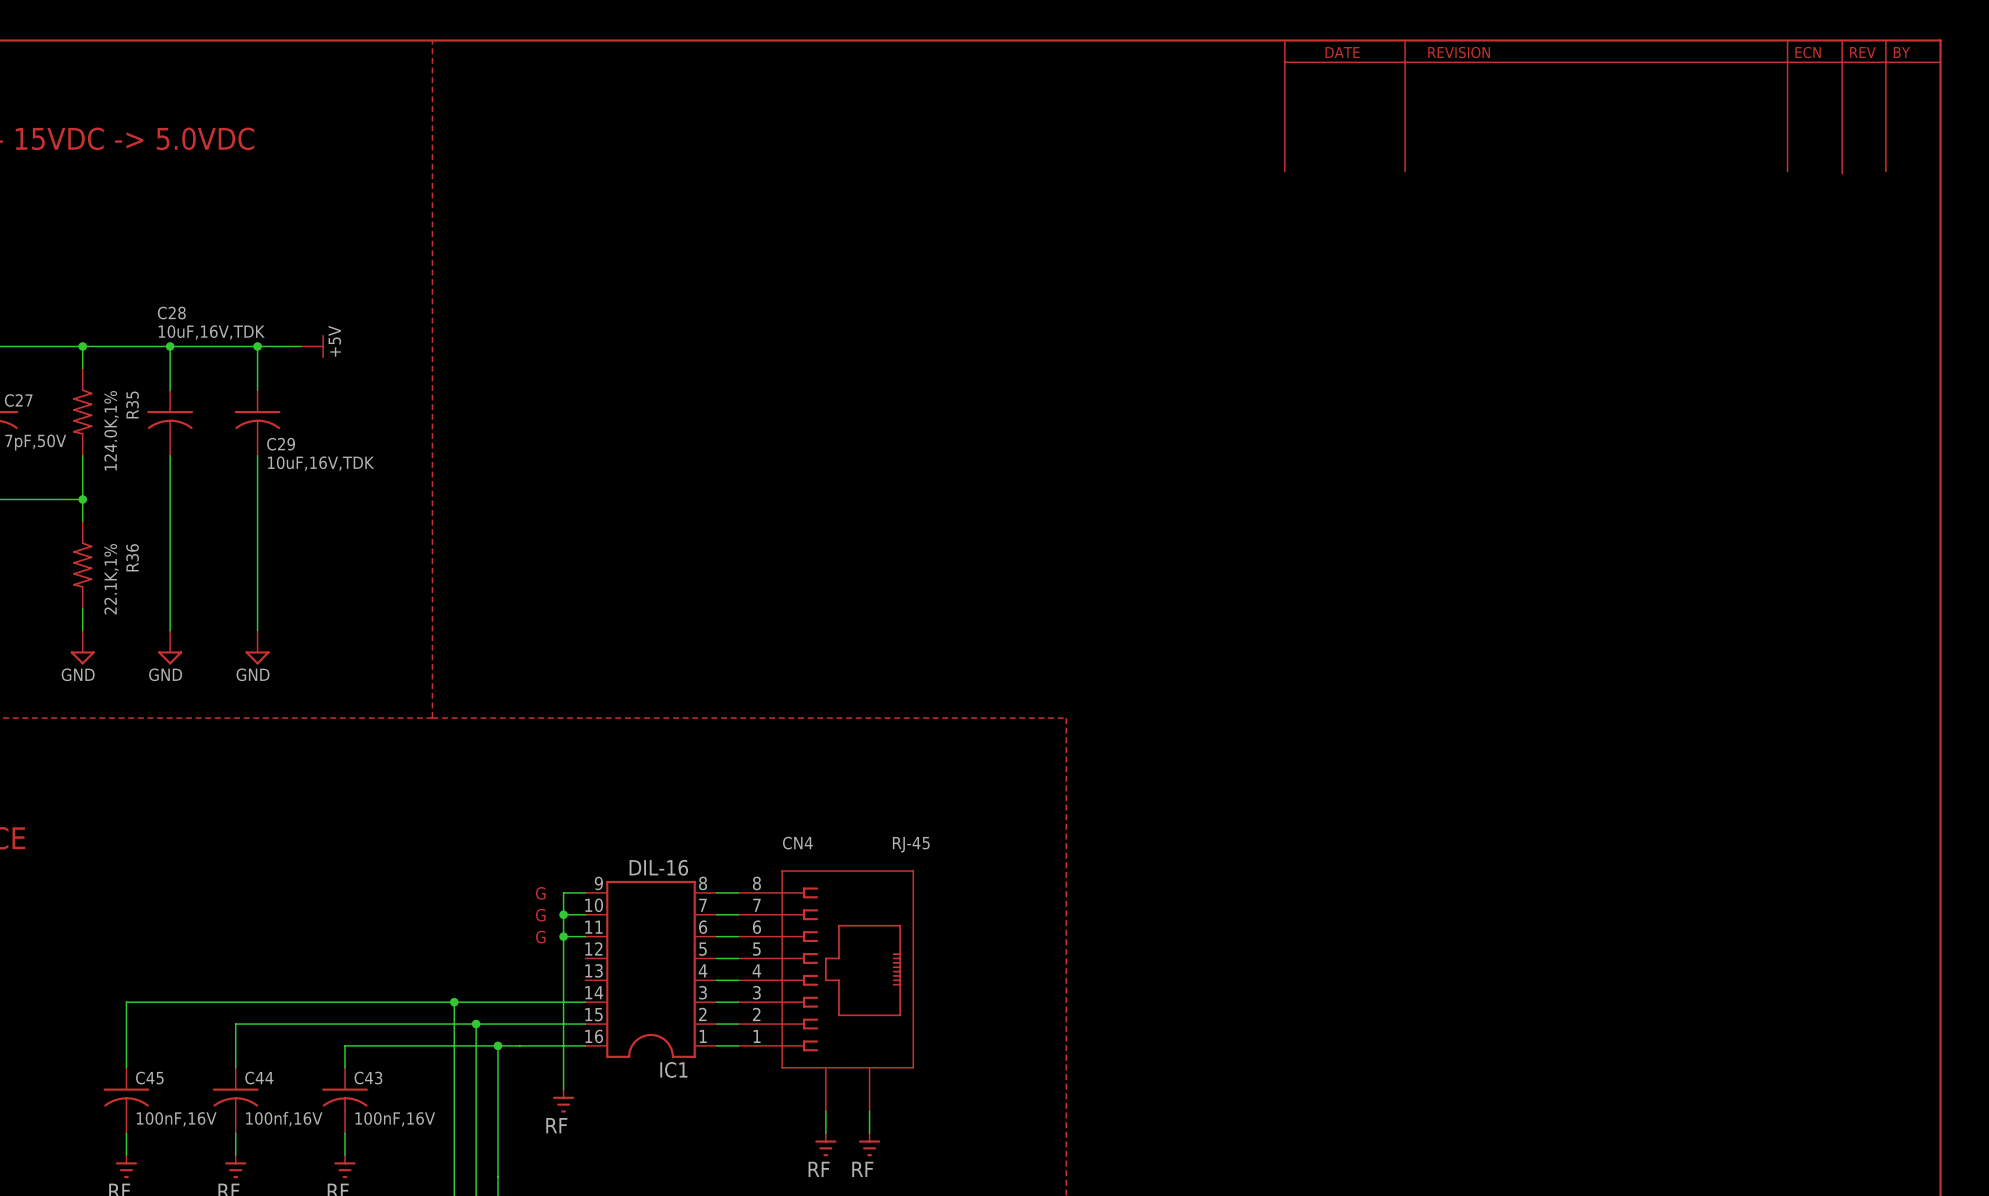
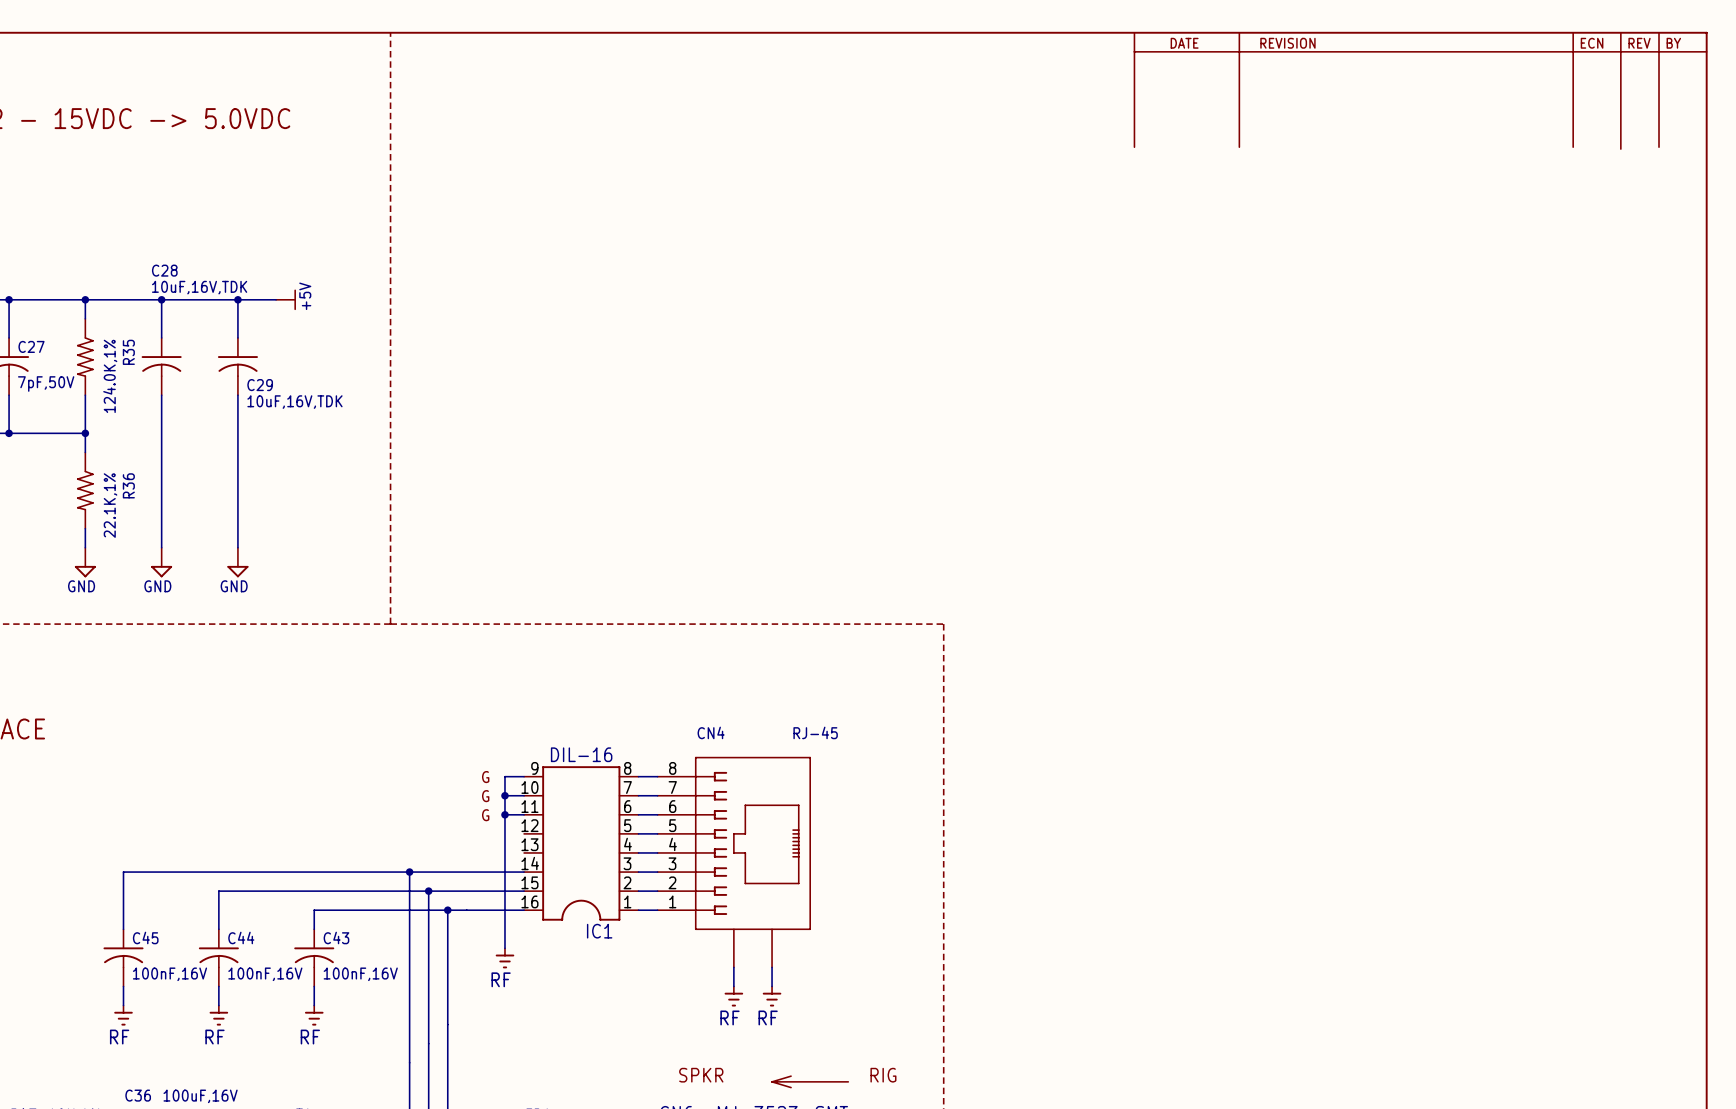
C44 value: 100nf,16V (284, 1119) -> 100nF,16V (265, 974)

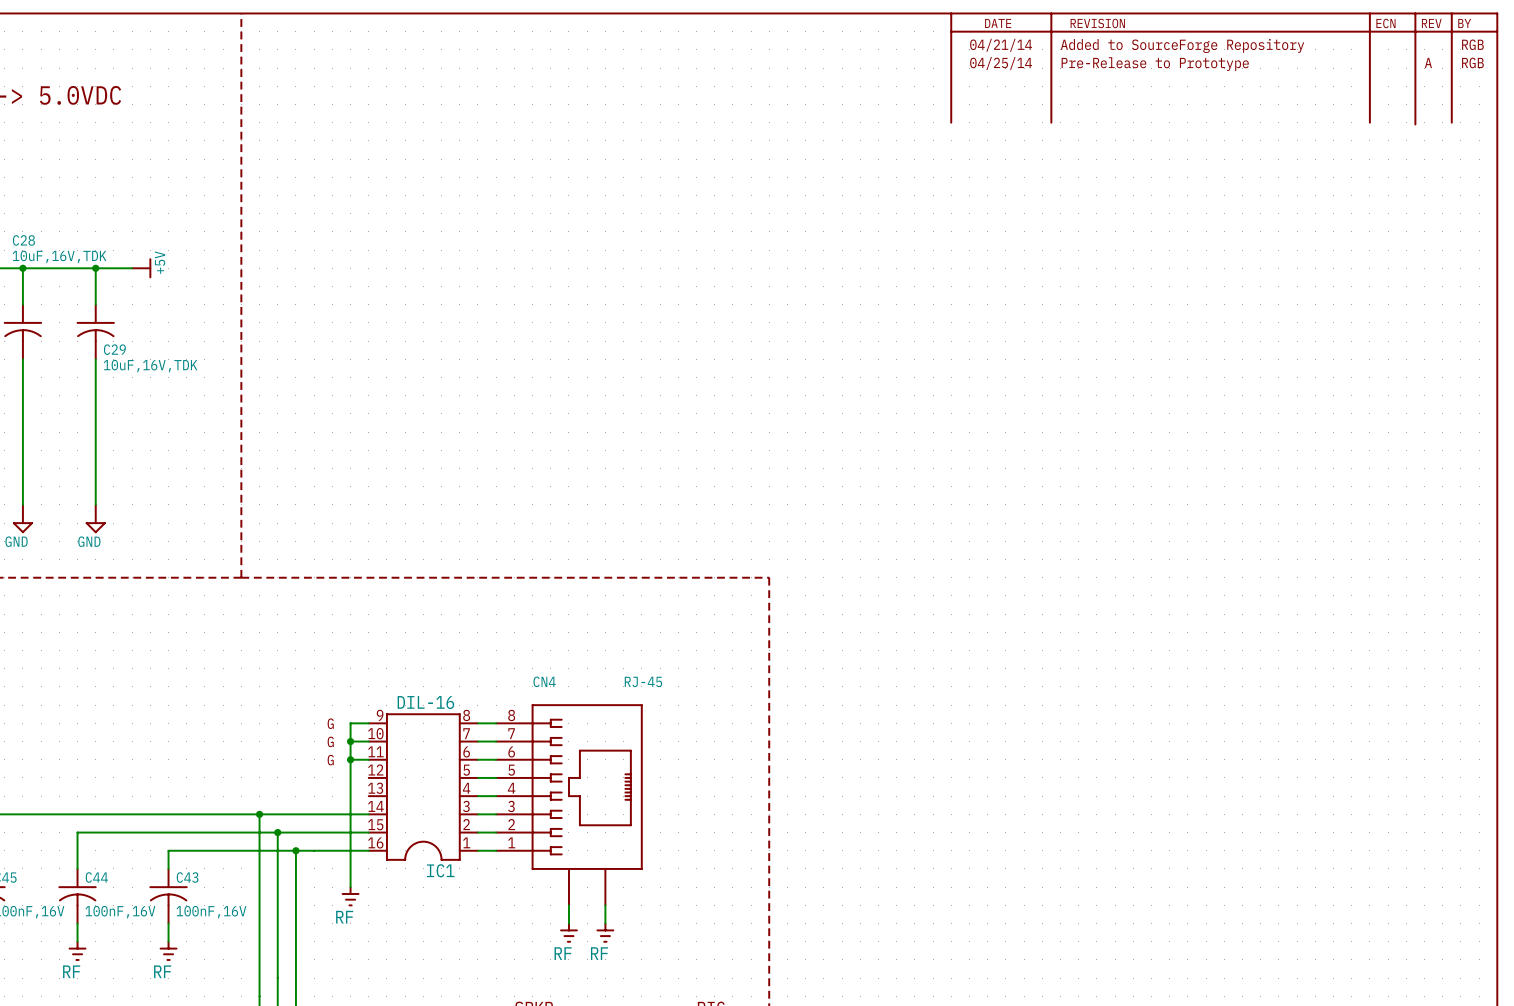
text: none -> RGB (1472, 44)
text: none -> 04/21/14 (1001, 45)
text: none -> Added to SourceForge Repository (1182, 45)
text: none -> A (1428, 62)
text: none -> RGB (1472, 62)
text: none -> 04/25/14 (1001, 63)
text: none -> Pre-Release to Prototype (1155, 64)

